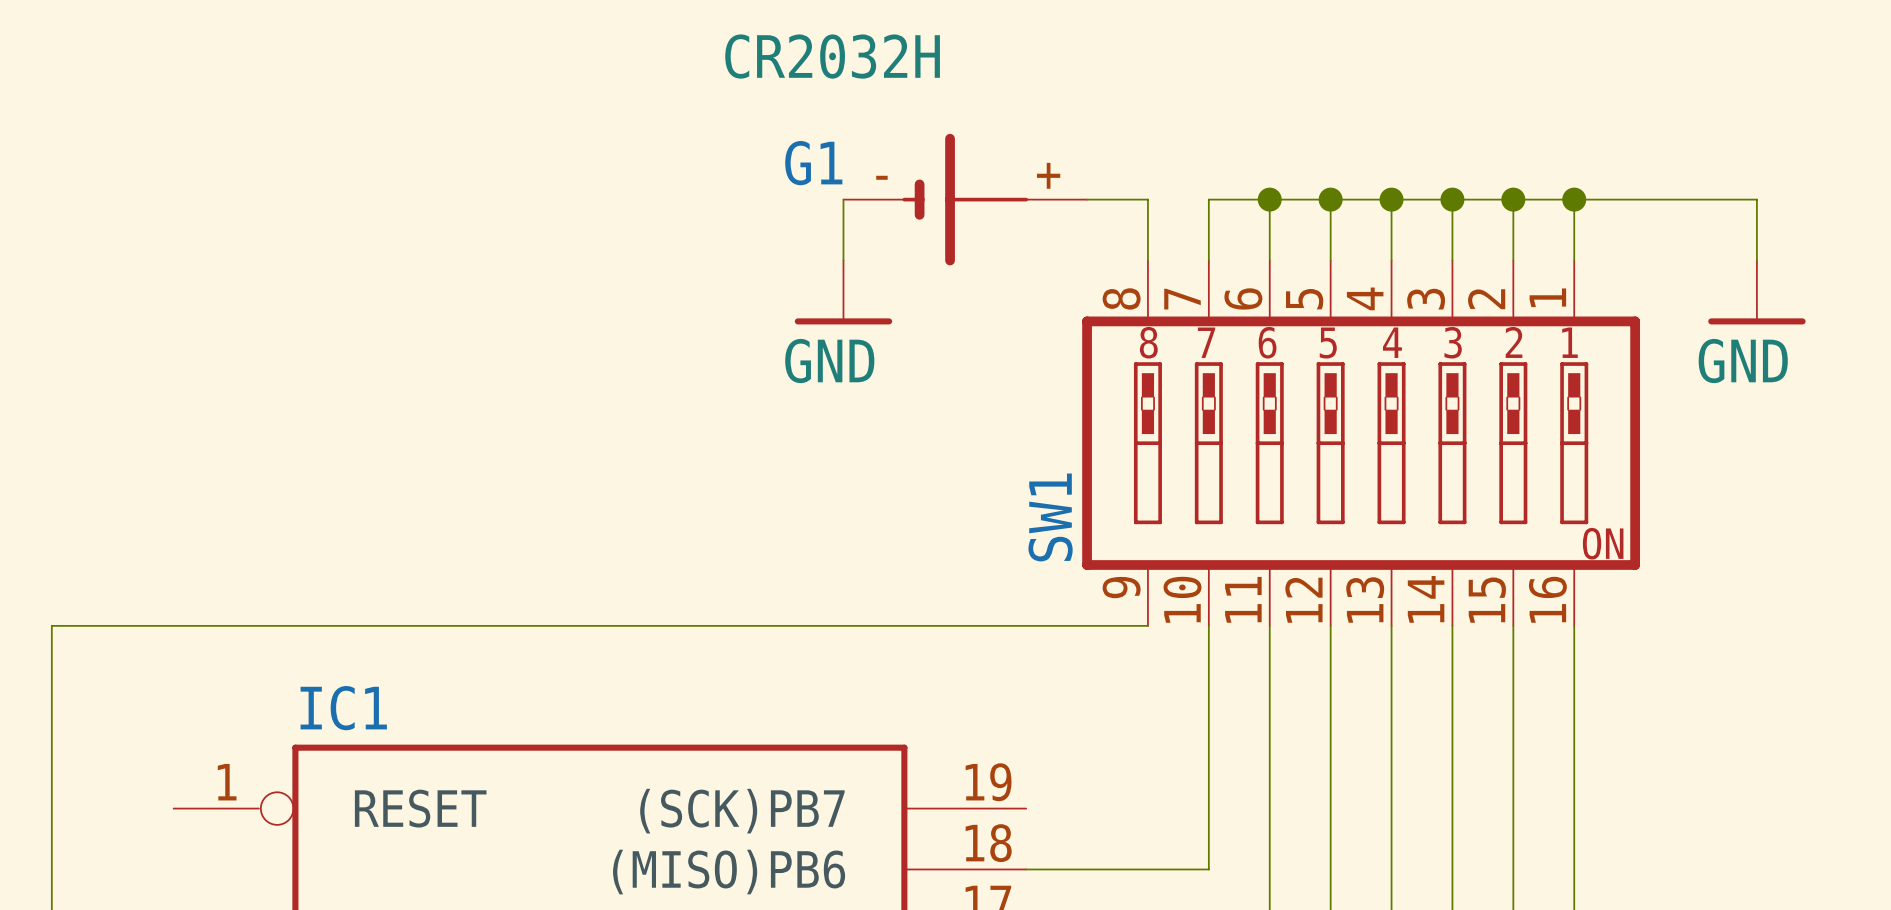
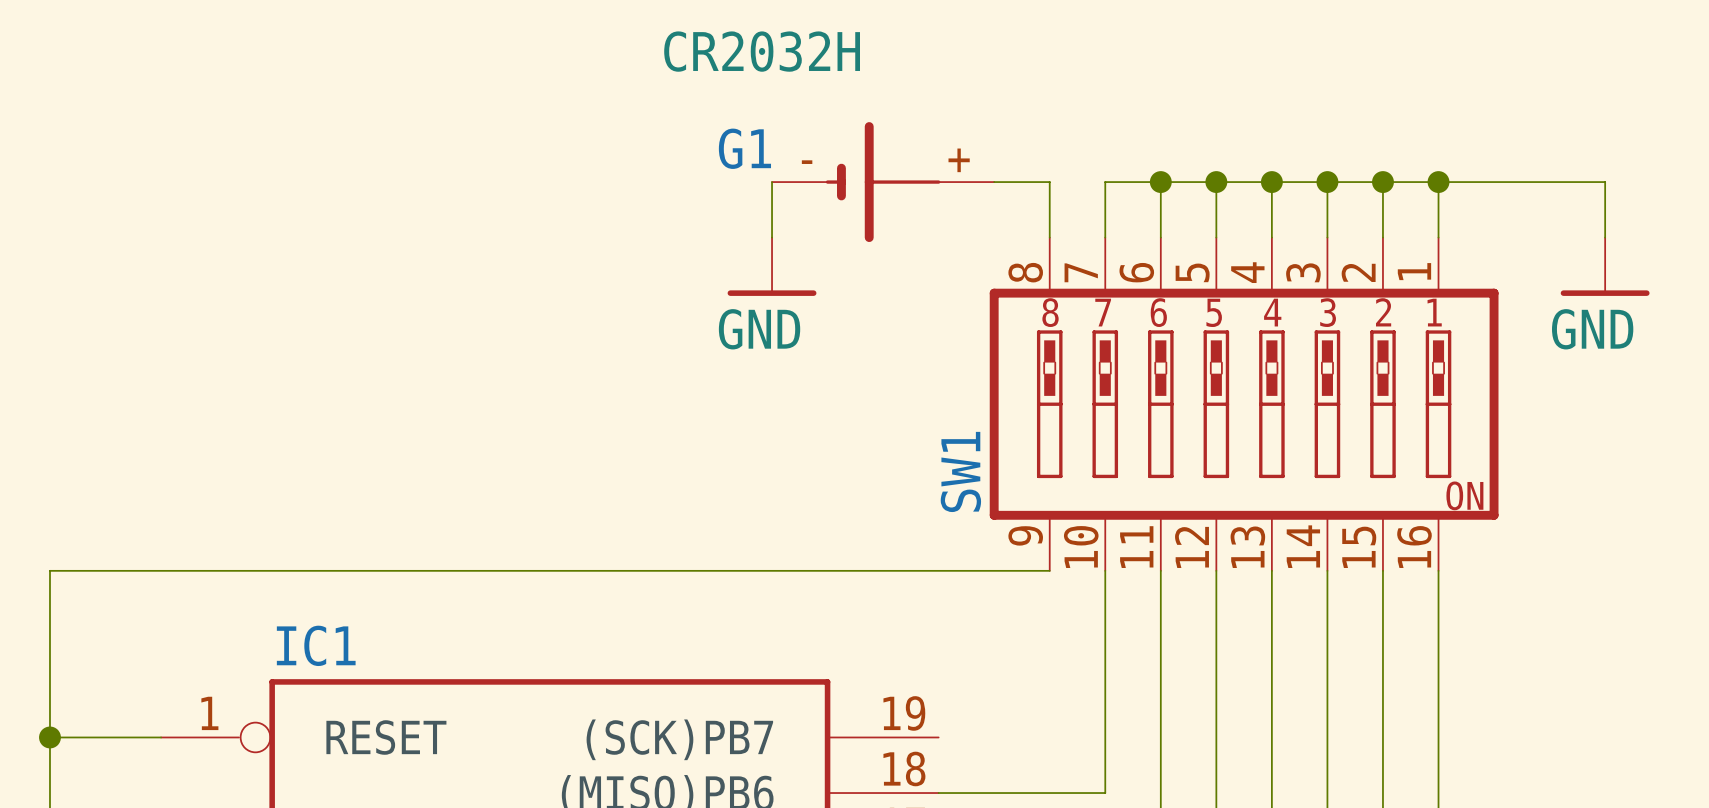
wire: none -> (49, 737) (161, 737)
junction: none -> (49, 737)

